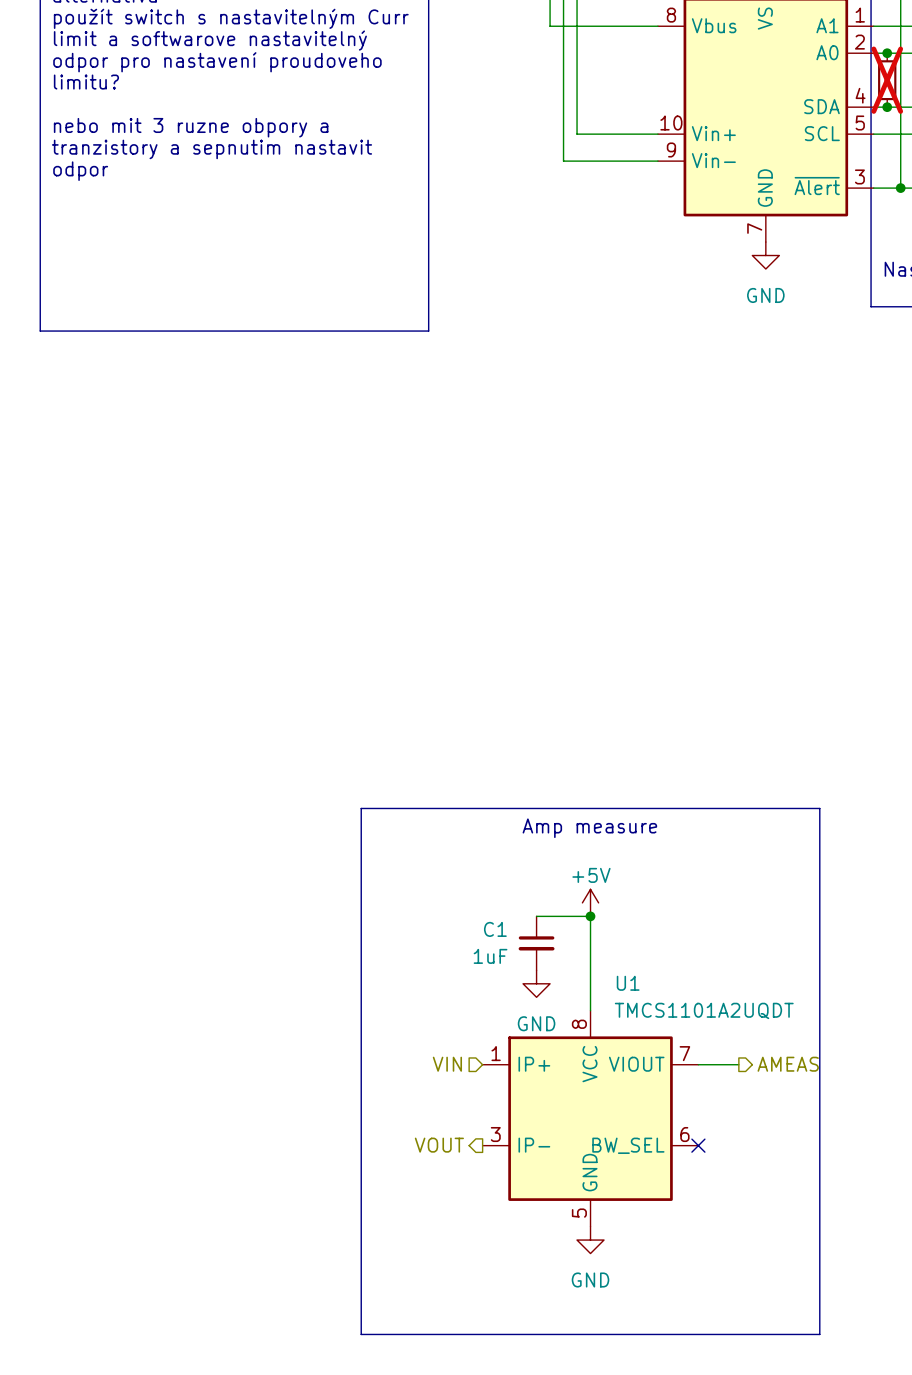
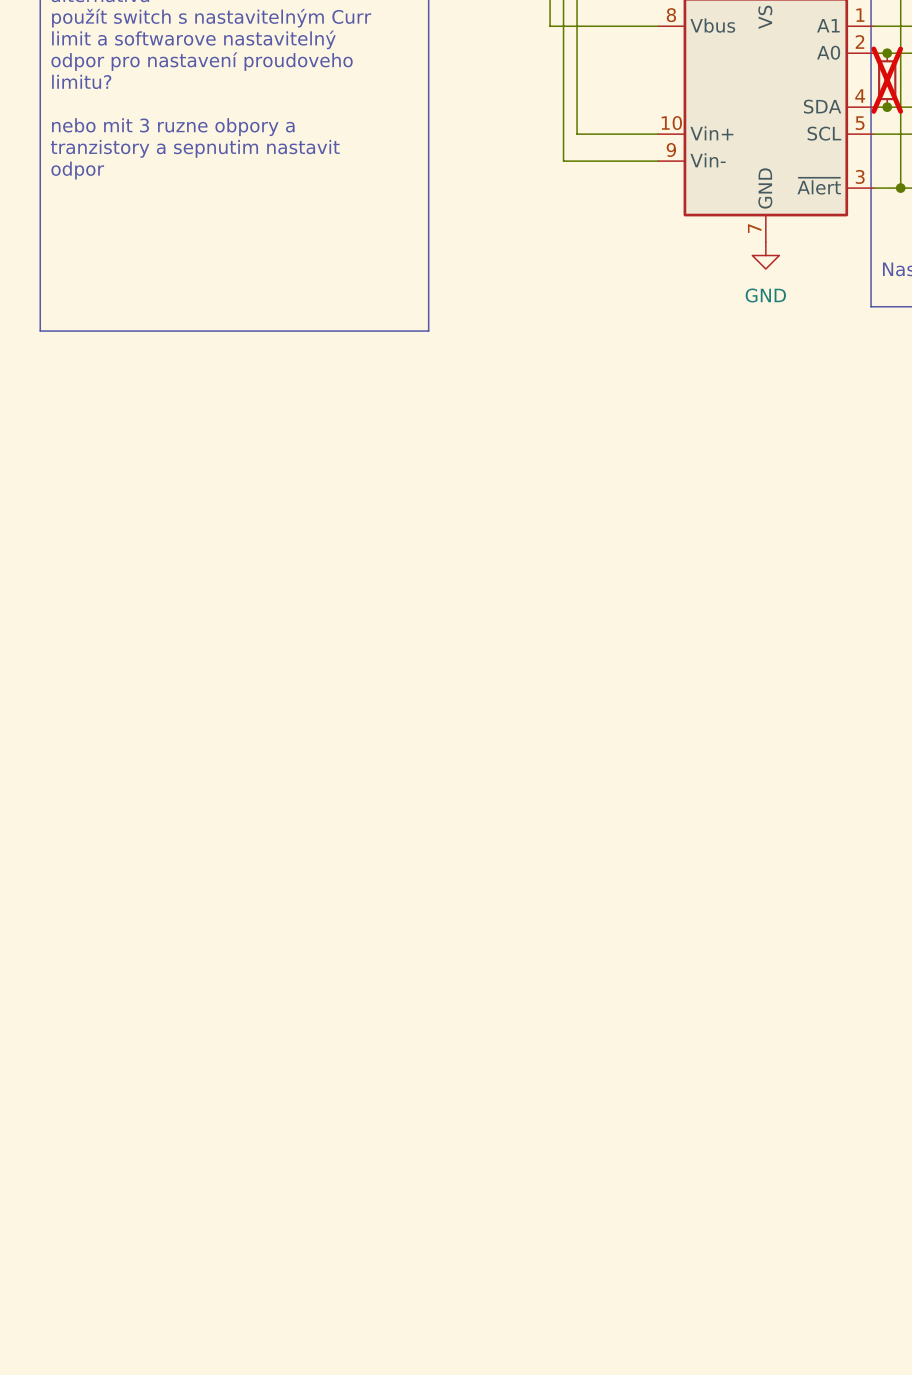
line: (361, 808) (819, 808) (819, 1334) (361, 1334) (361, 808) -> none
text: Amp measure (589, 828) -> none
power symbol: +5V (590, 902) -> none
wire: (536, 916) (590, 916) (590, 1010) -> none
junction: (590, 916) -> none
C1: 1uF (536, 943) -> none
power symbol: GND (536, 983) -> none
hierarchical label: VIN (447, 1064) -> none
wire: (698, 1064) (738, 1064) -> none
hierarchical label: AMEAS (788, 1064) -> none
U1: TMCS1101A2UQDT (590, 1118) -> none
hierarchical label: VOUT (439, 1145) -> none
no-connect mark: (698, 1145) -> none
power symbol: GND (590, 1240) -> none

